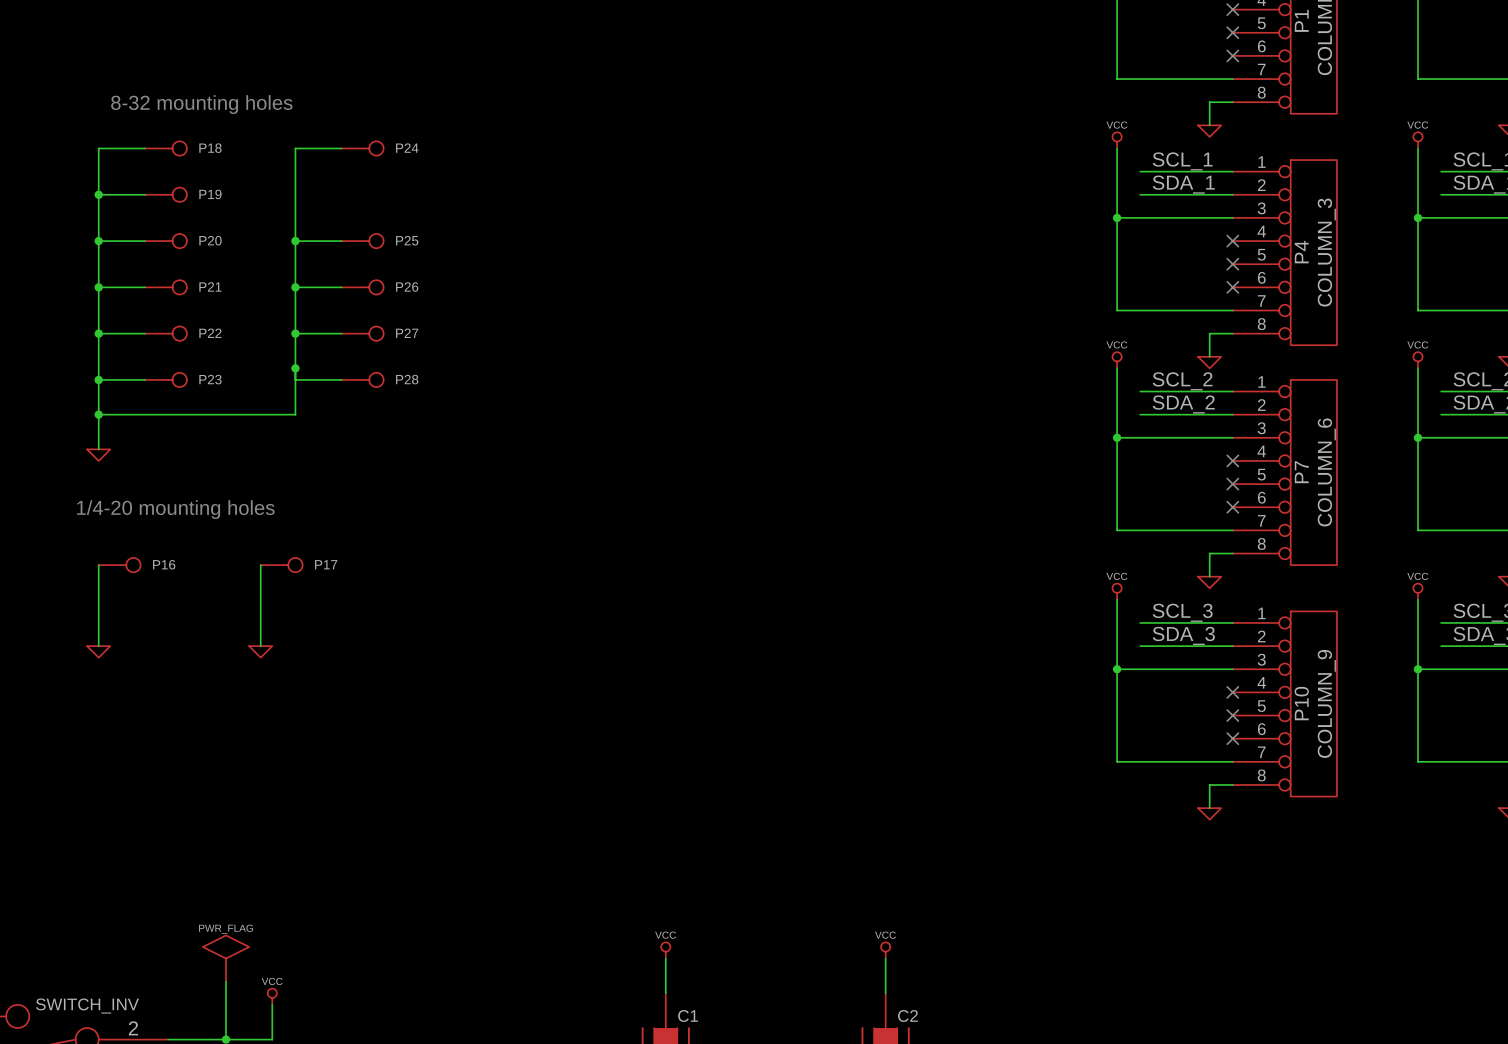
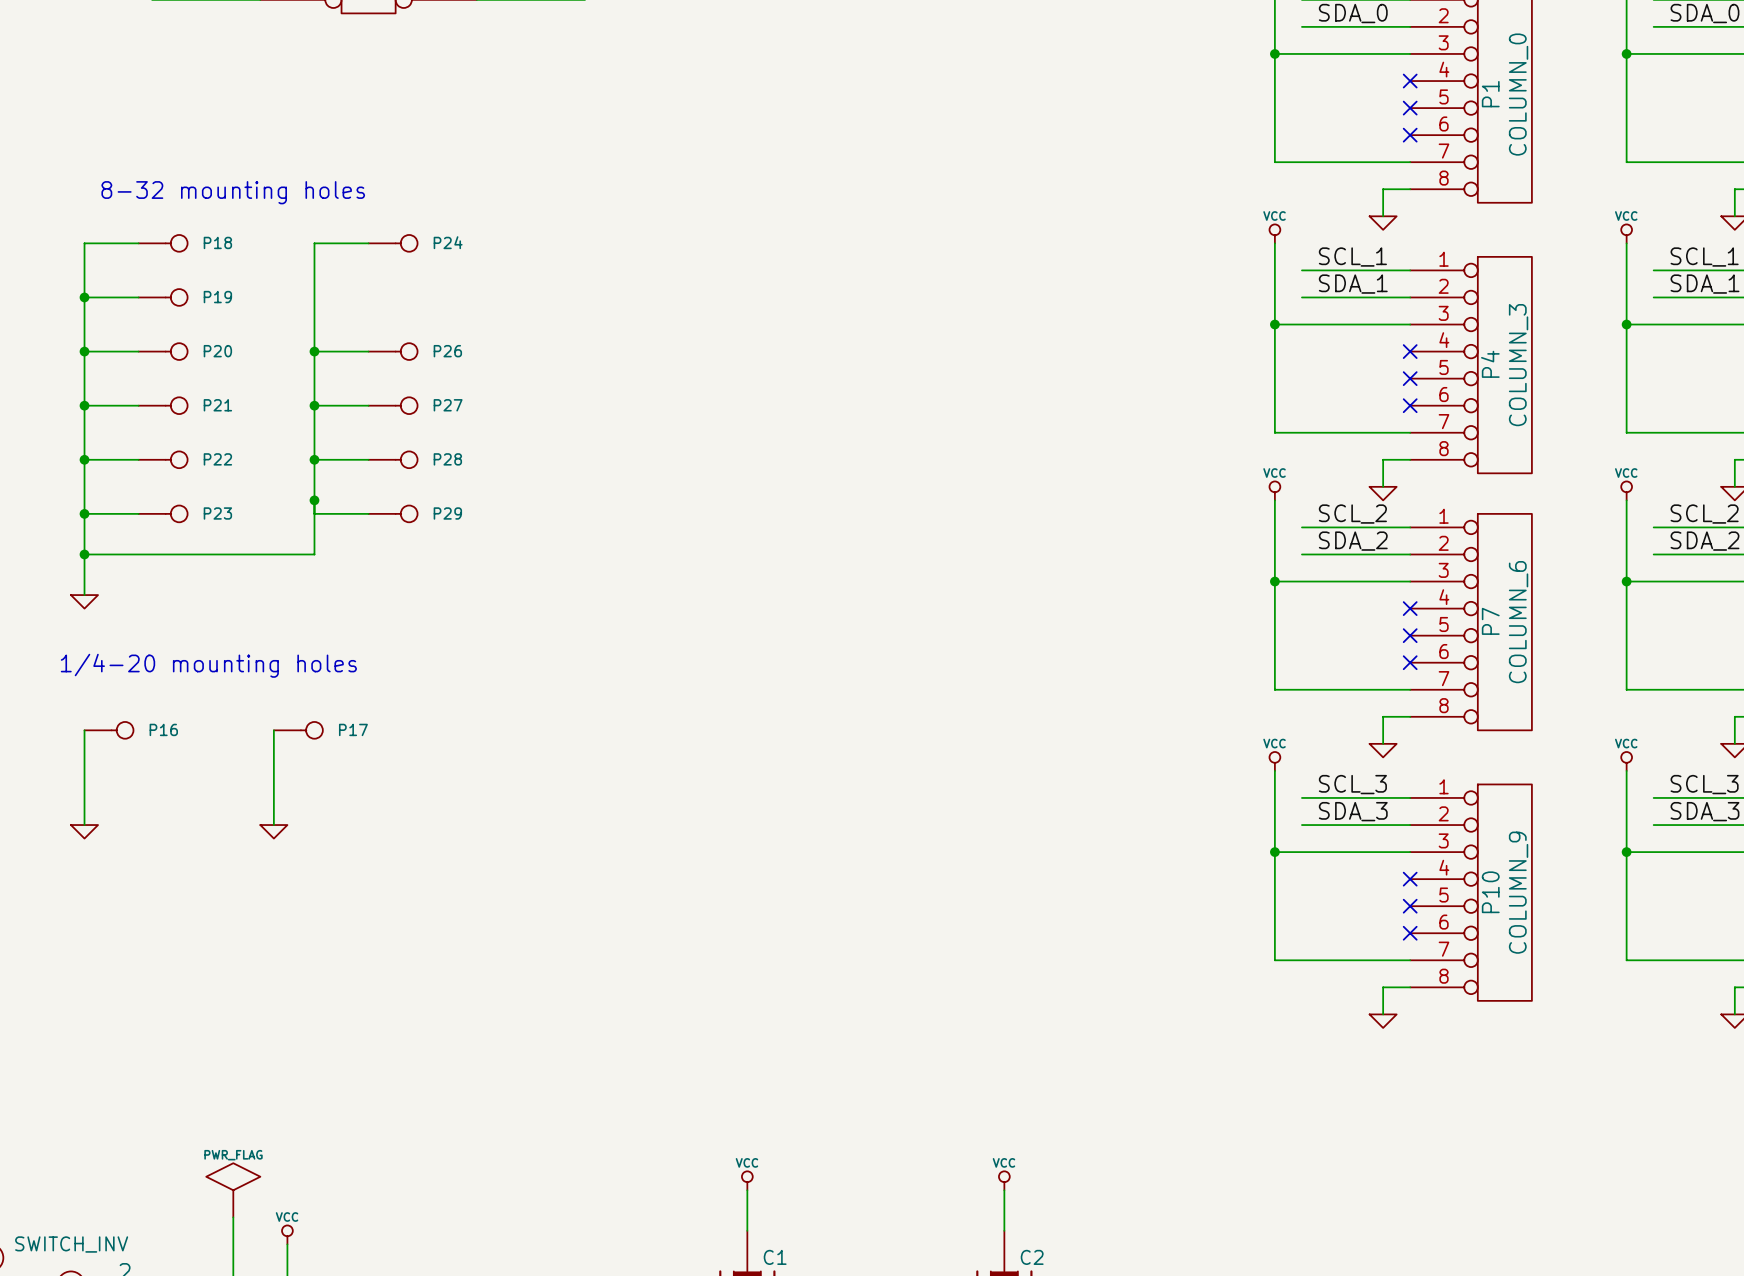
P25 name: P25 (407, 240) -> P26 (447, 351)
P26 name: P26 (407, 287) -> P27 (448, 405)
P27 name: P27 (407, 333) -> P28 (447, 459)
P28 name: P28 (407, 379) -> P29 (447, 513)

